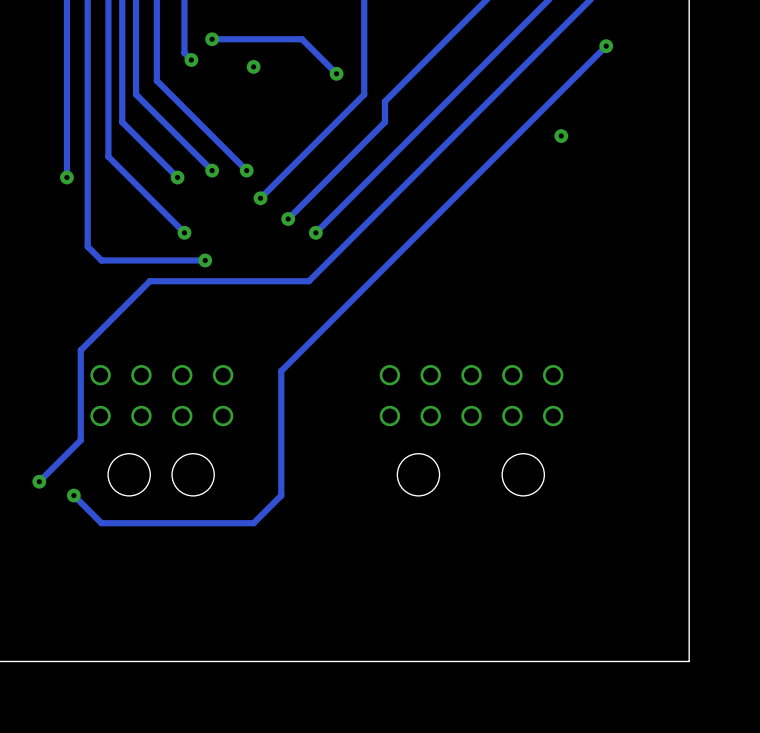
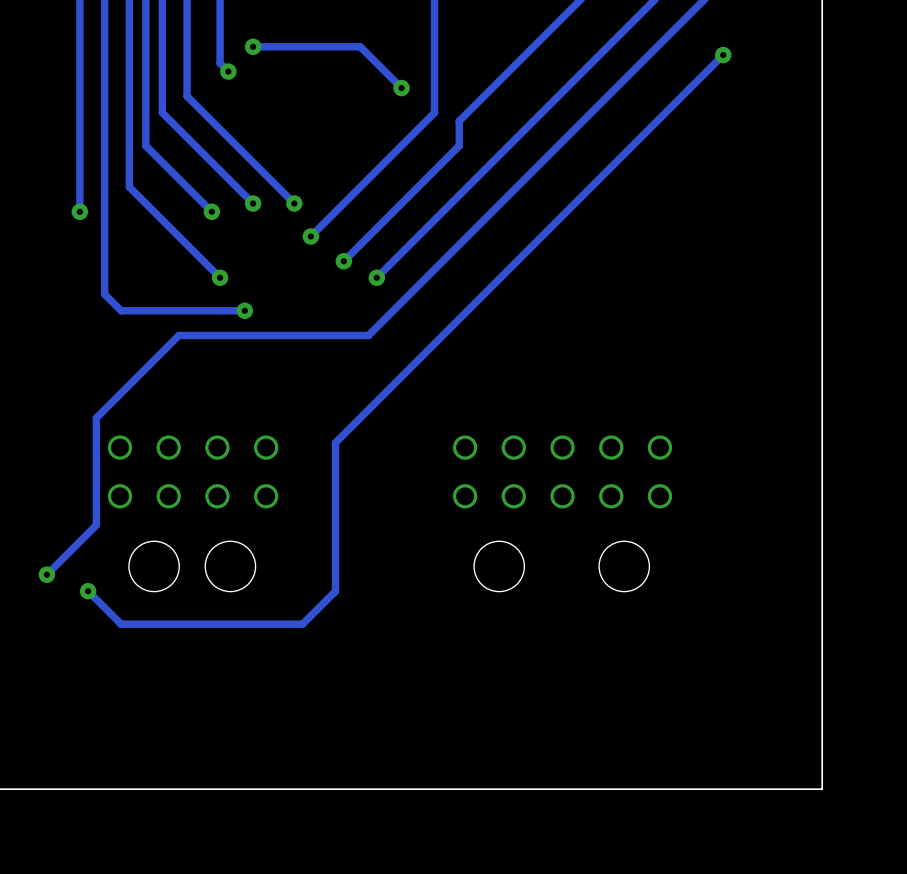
via: (253, 66) -> none
via: (561, 136) -> none

